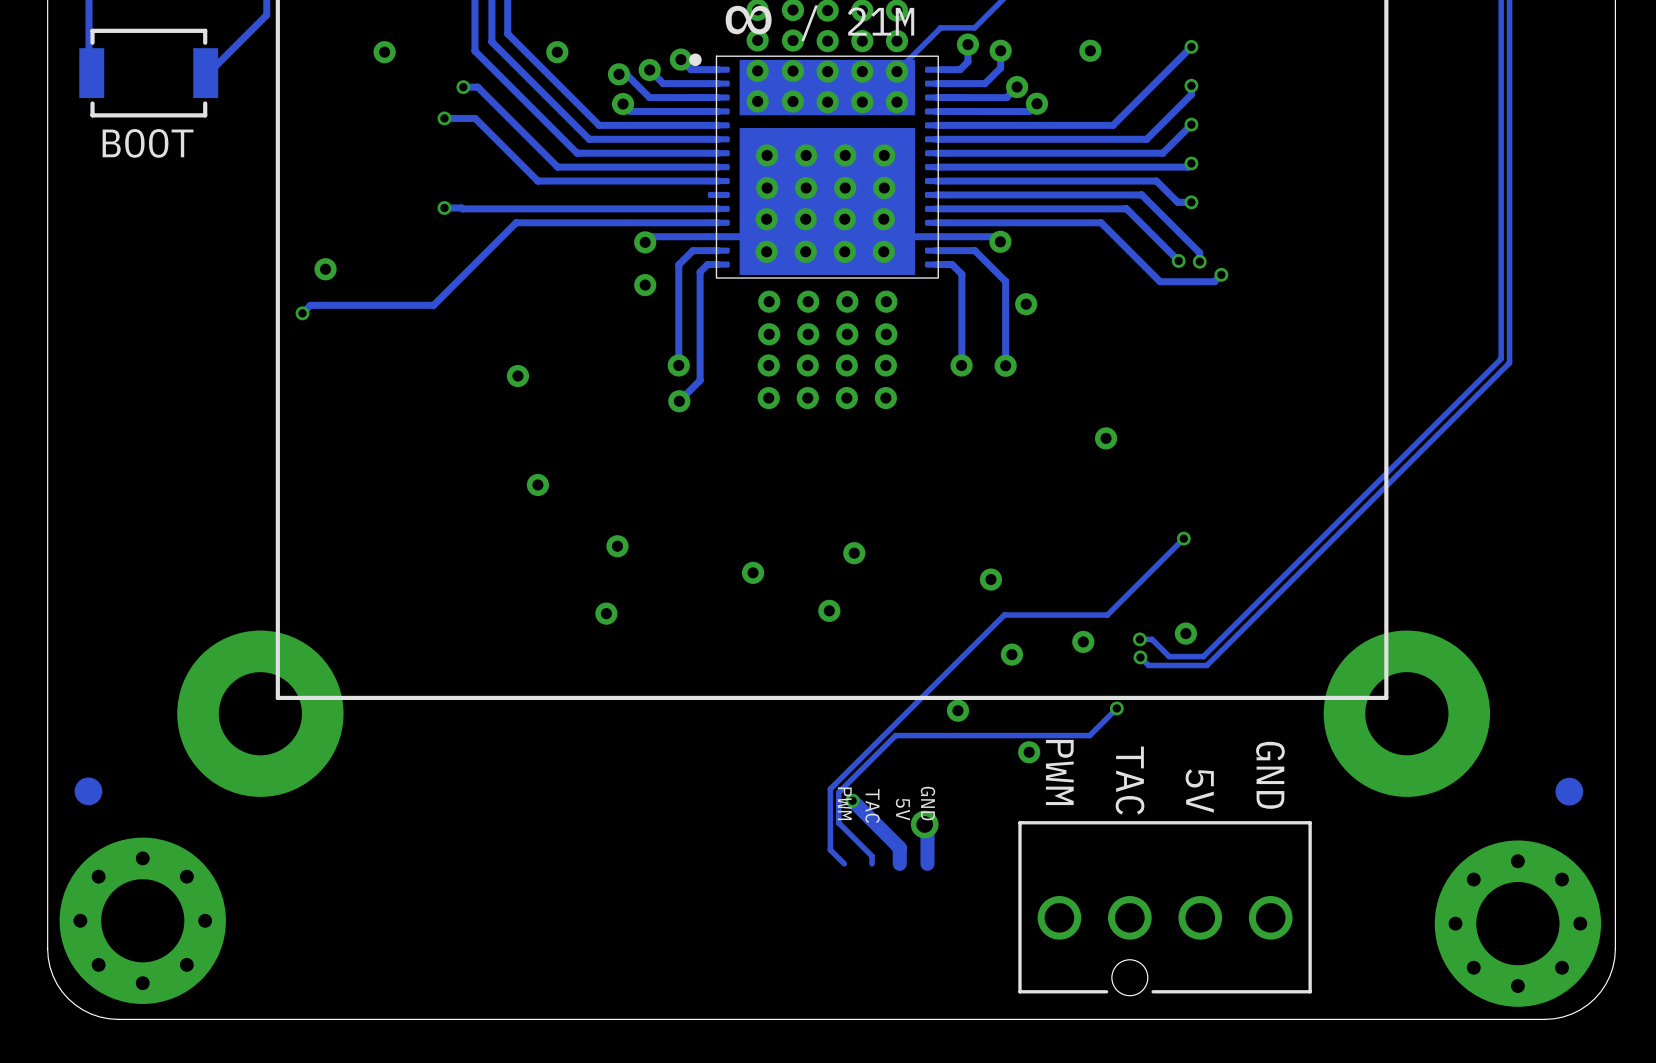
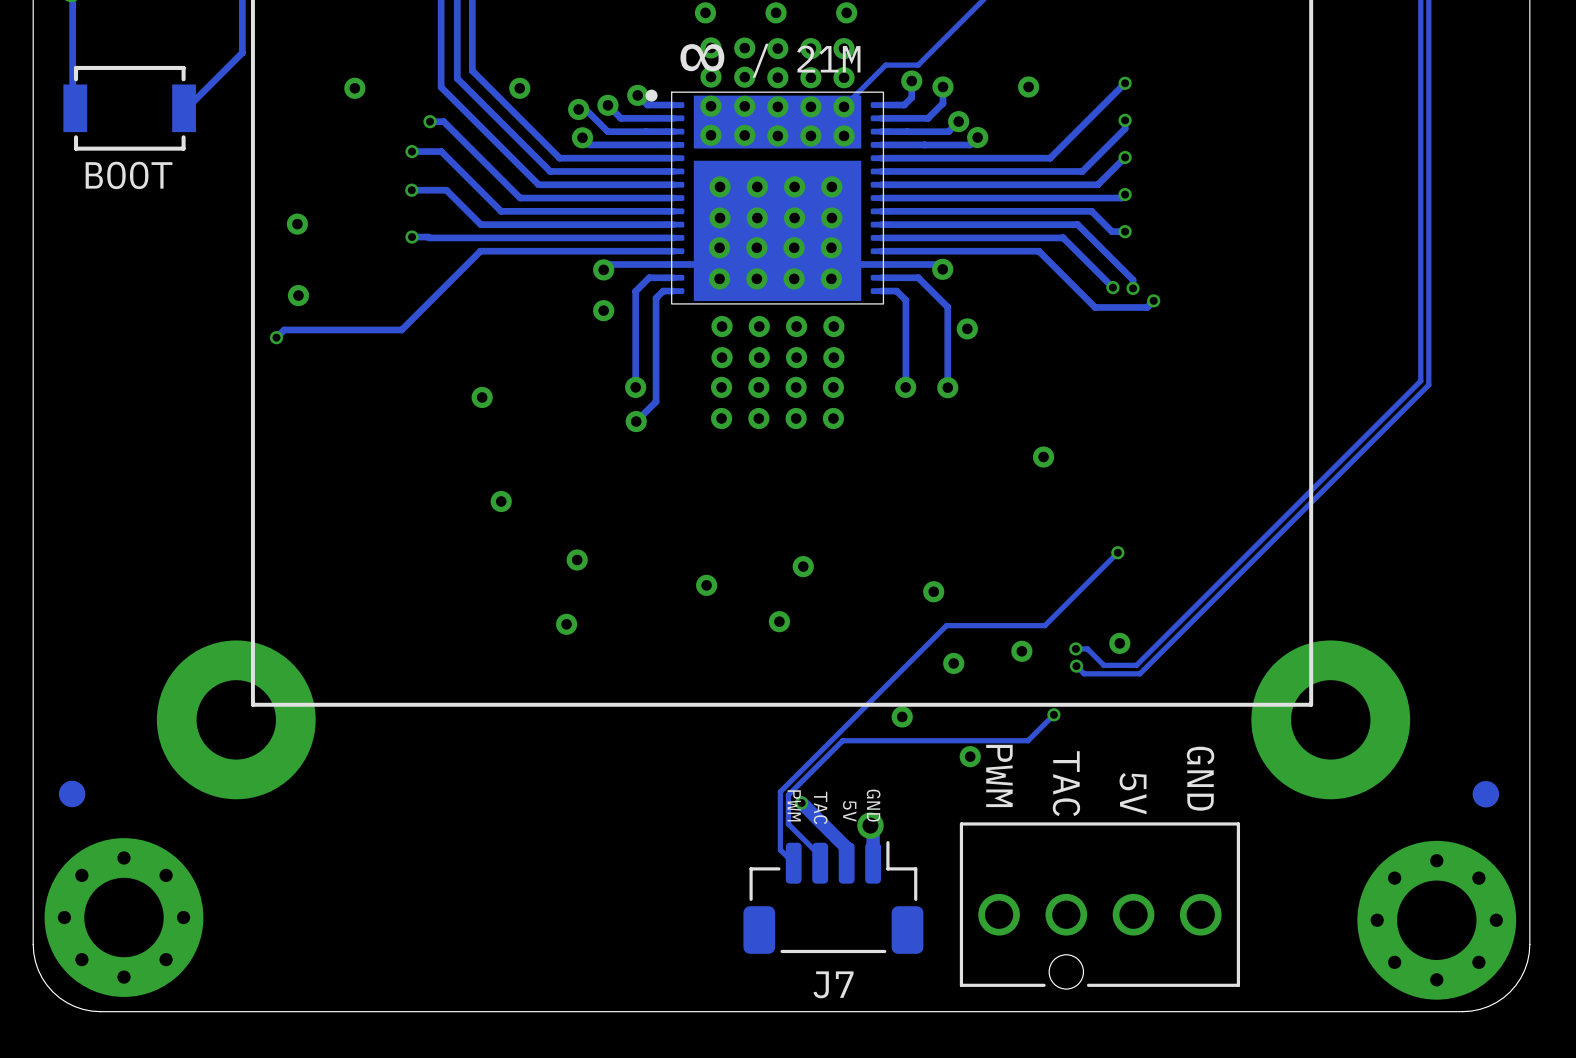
track: none -> (411, 190) (446, 190) (480, 224) (673, 224)
via: none -> (411, 190)
via: none -> (297, 224)
J7: none -> (833, 897)

